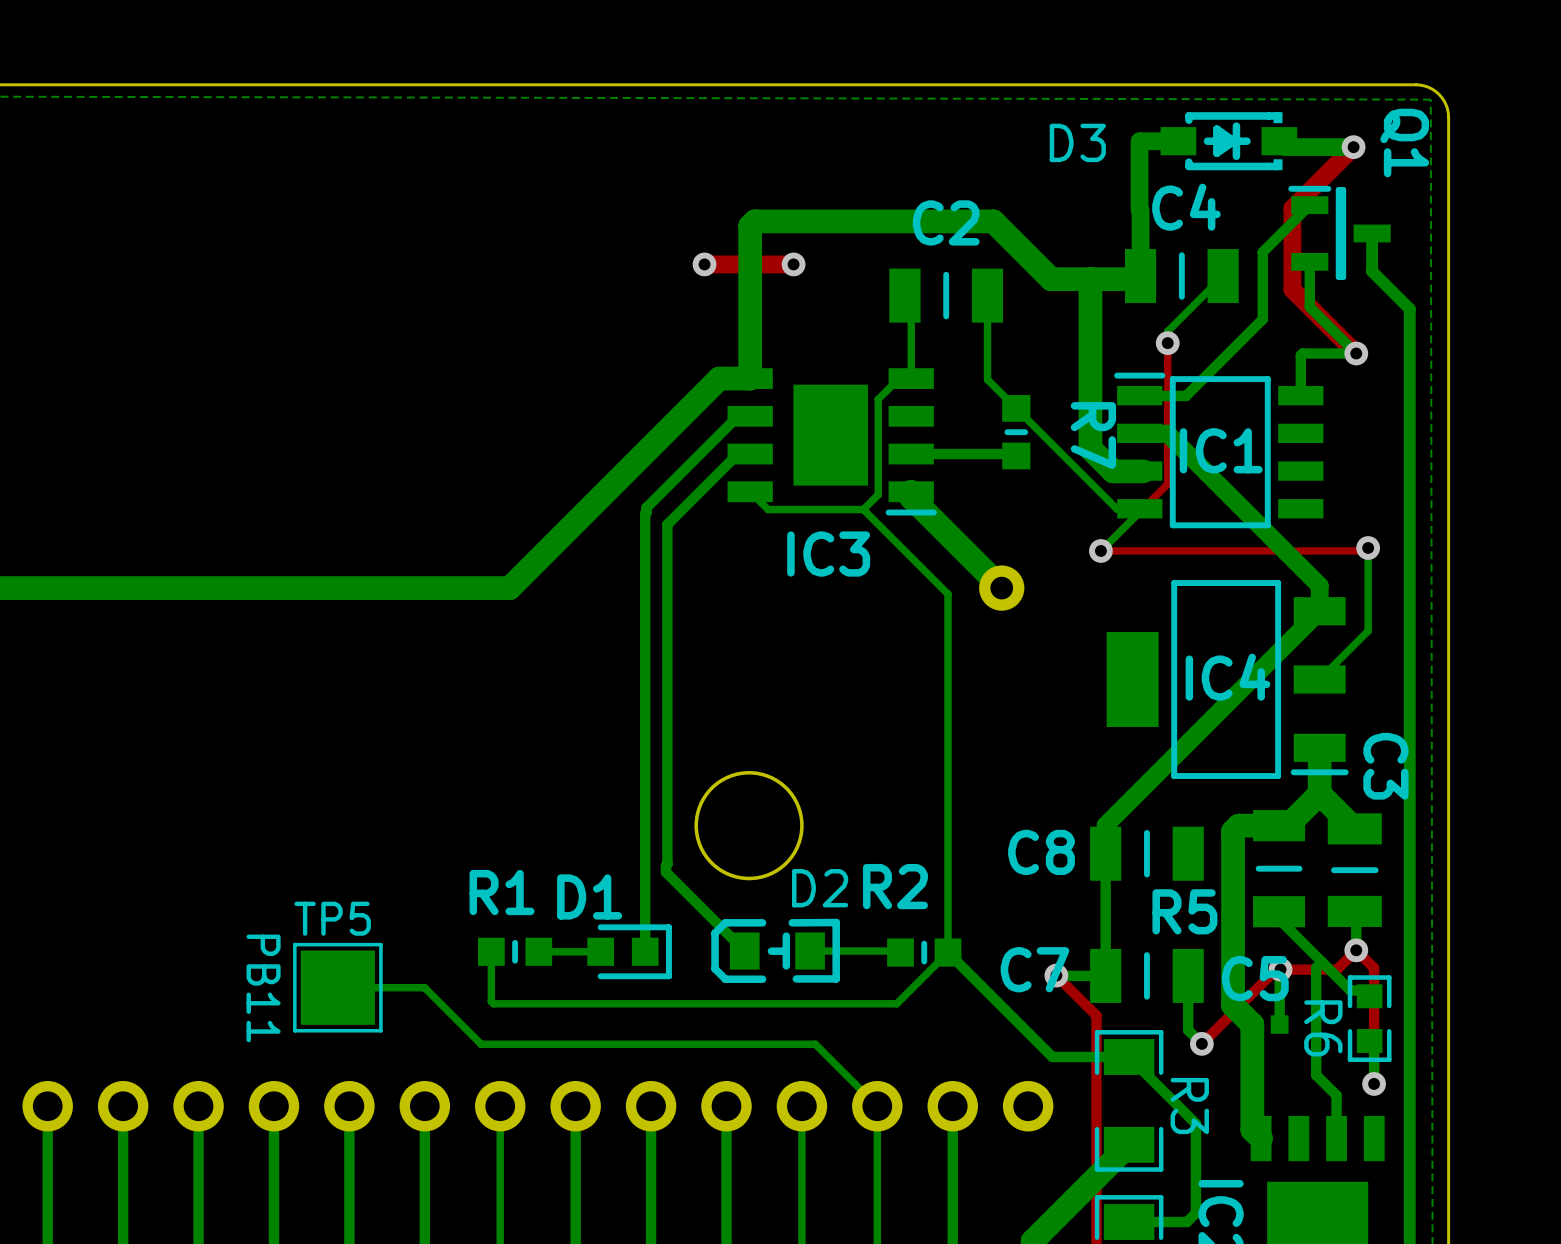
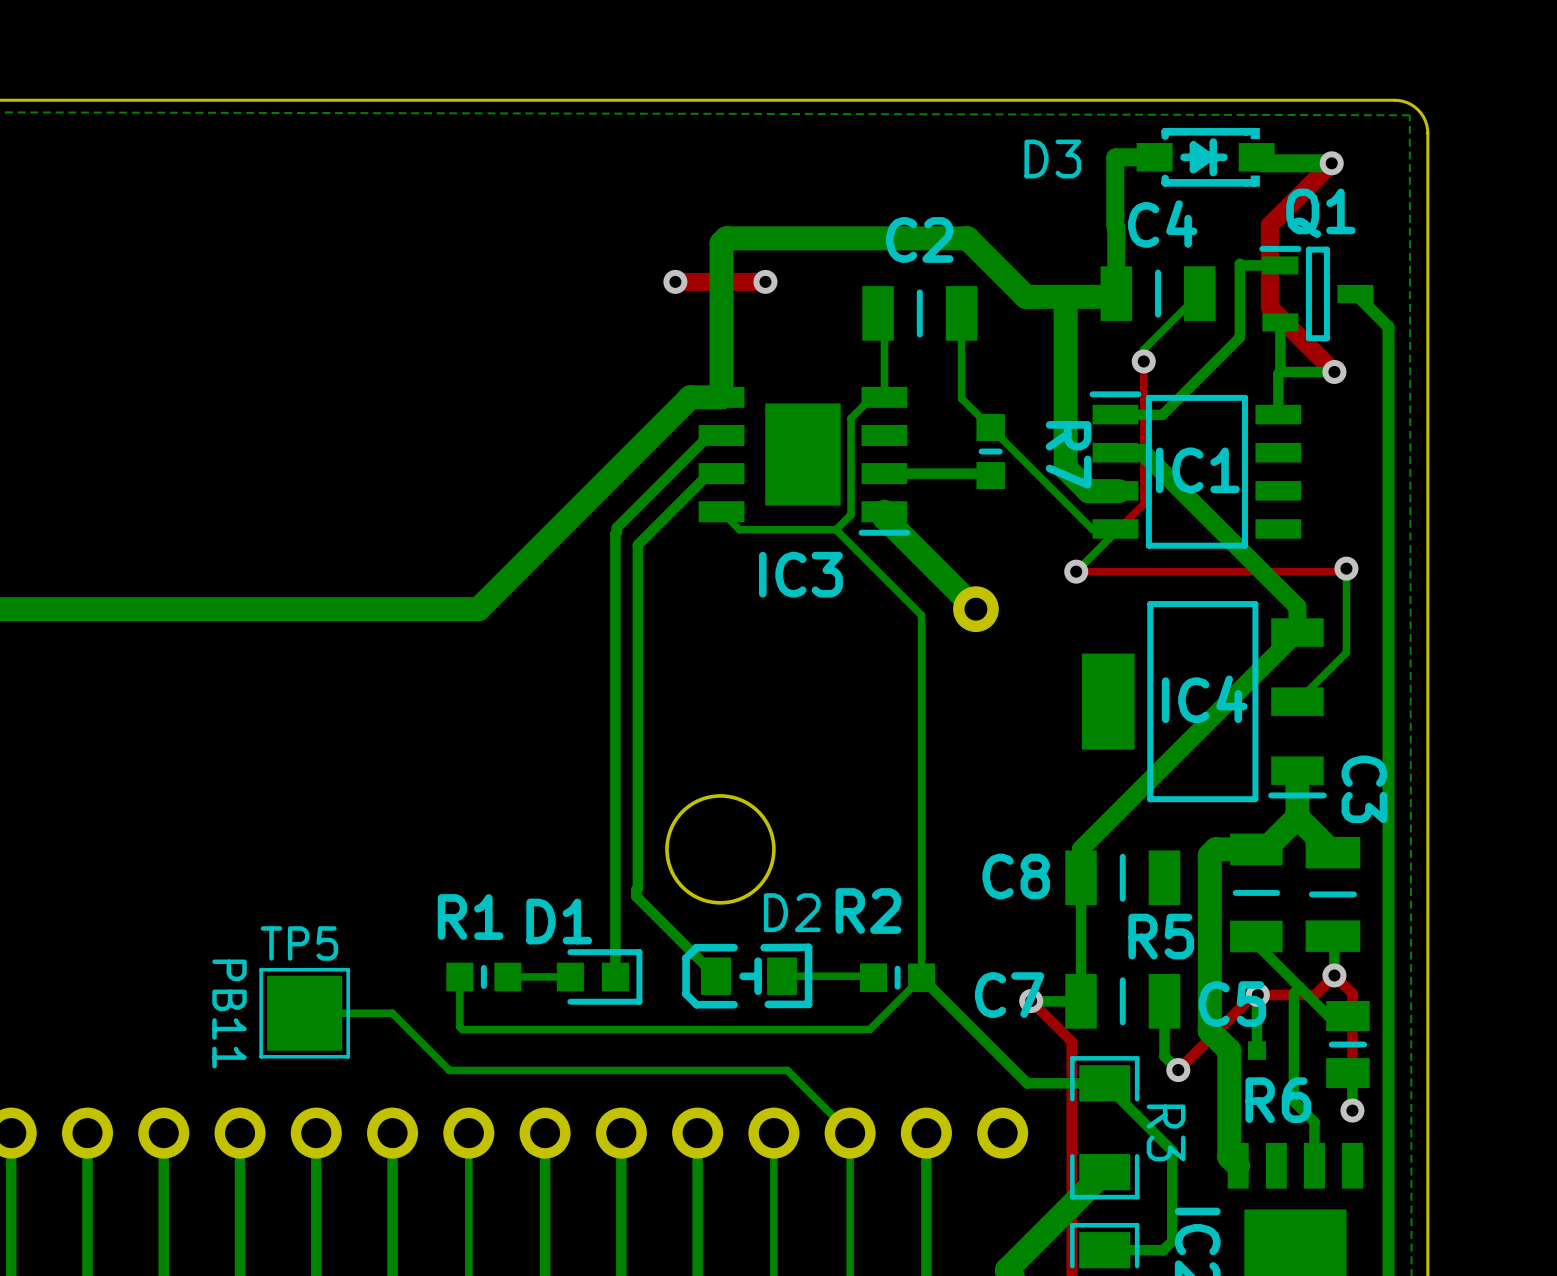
Q1 name position: Q1 (1404, 142) -> Q1 (1320, 213)
Q1 footprint: [1288, 185, 1391, 280] -> [1259, 245, 1374, 342]
bottom track: (1309, 205) (1262, 252) -> (1280, 265) (1239, 263) (1239, 269)
bottom track: (1372, 233) (1372, 271) (1377, 276) -> none
bottom track: (1309, 261) (1309, 307) (1356, 353) -> none
bottom track: none -> (1280, 322) (1280, 371)
R6 footprint: [1347, 975, 1392, 1063] -> [1326, 1001, 1370, 1089]

